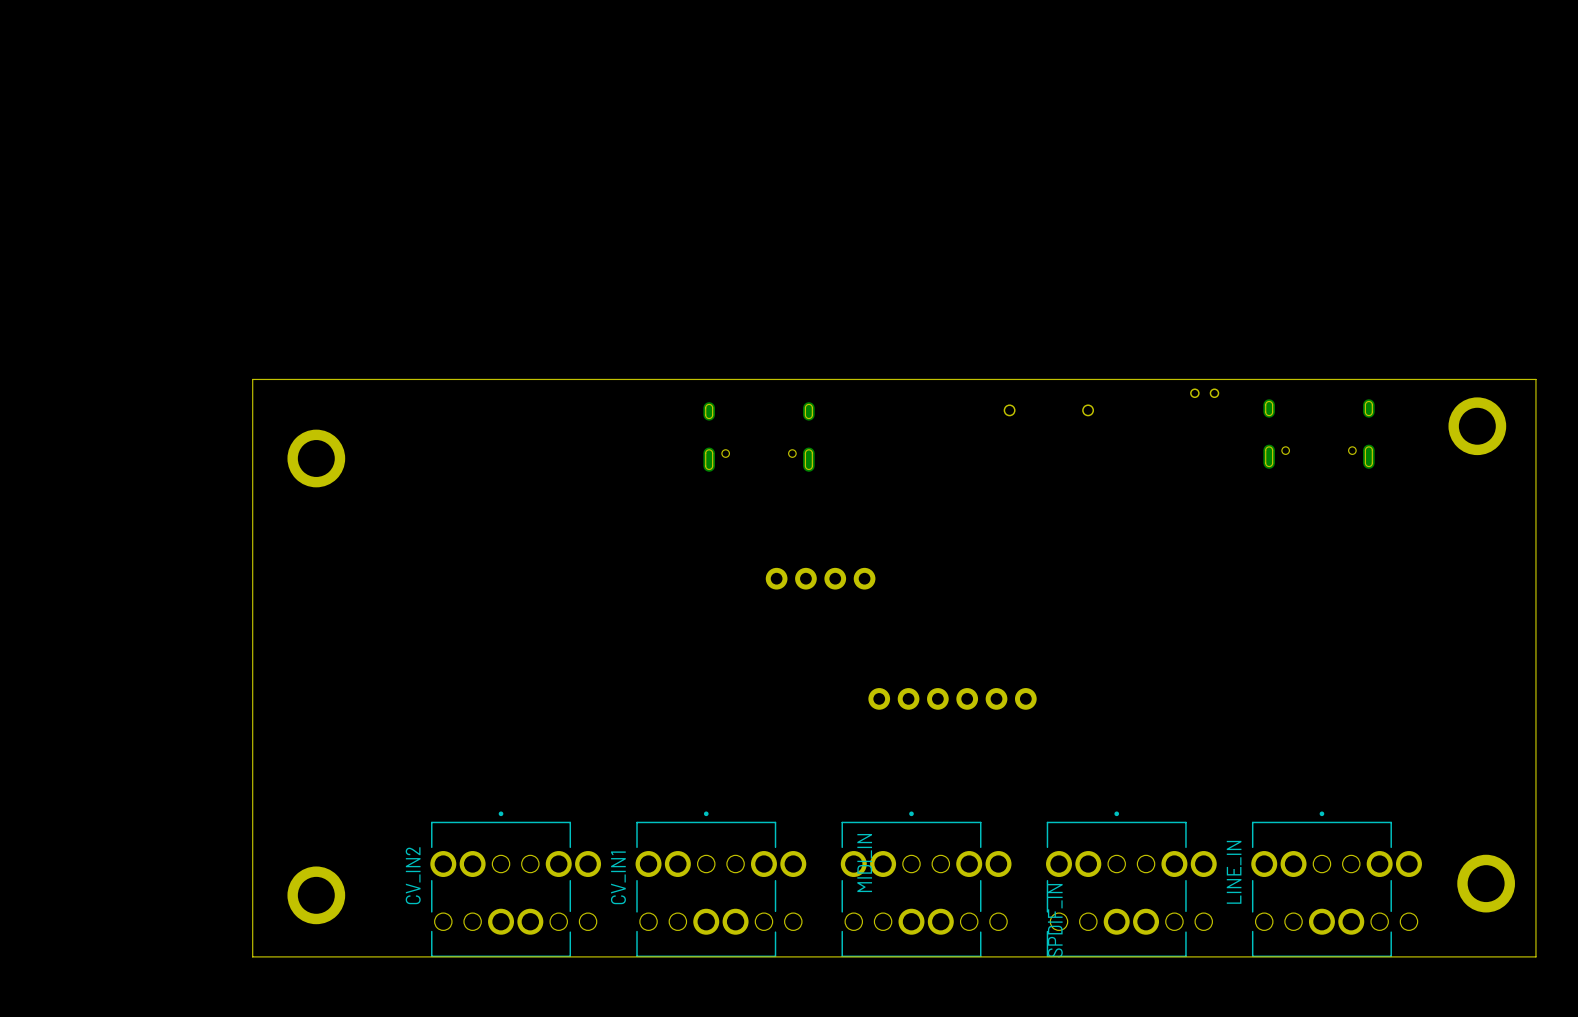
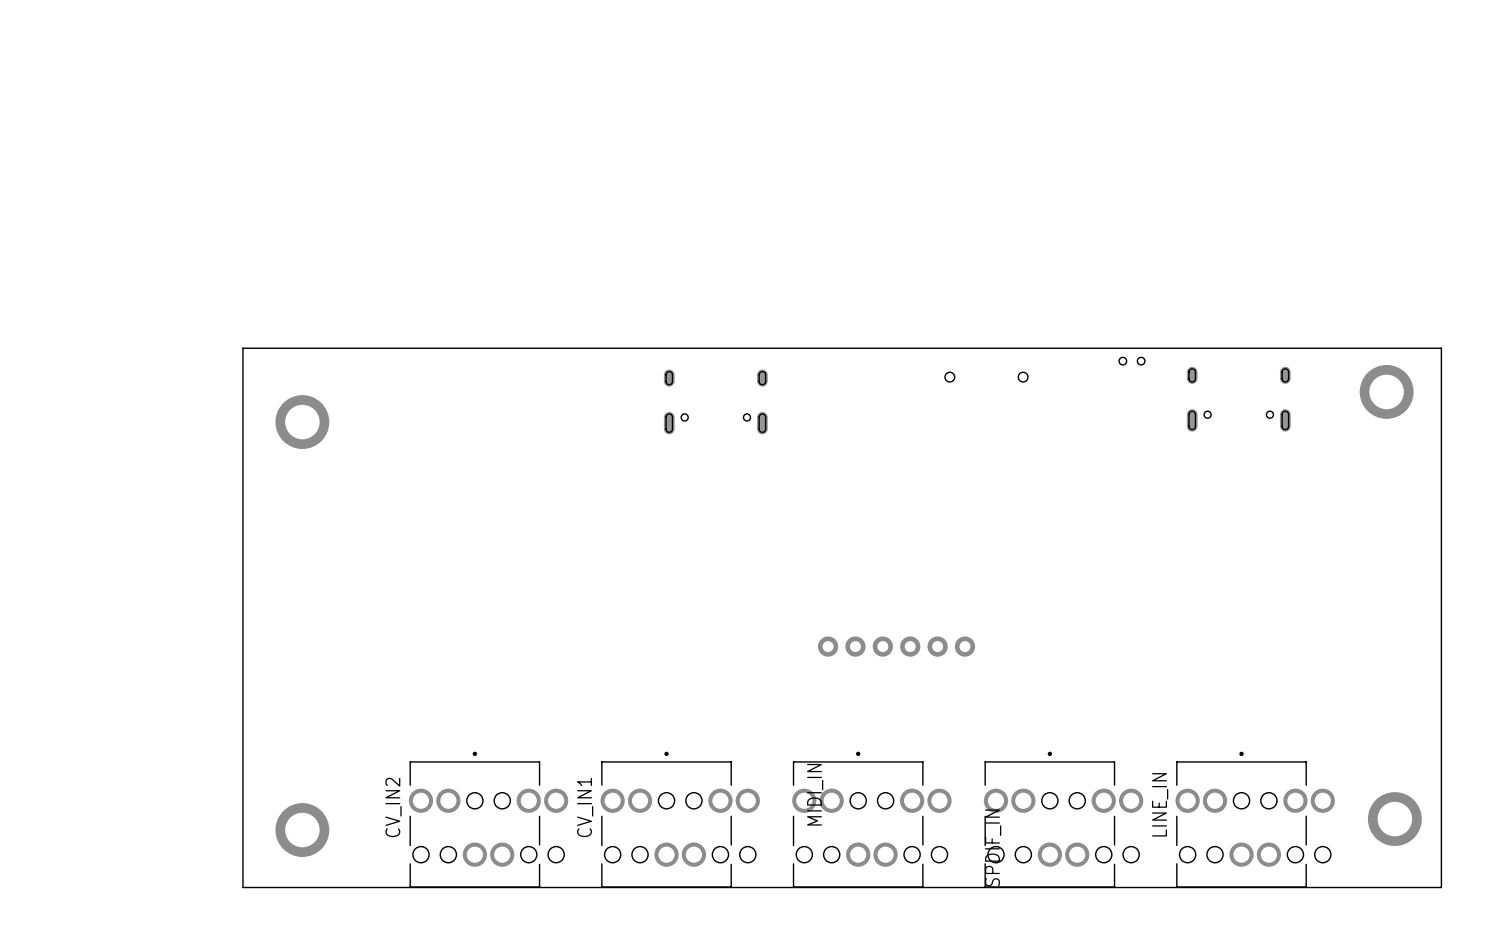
part: (820, 578) -> none

